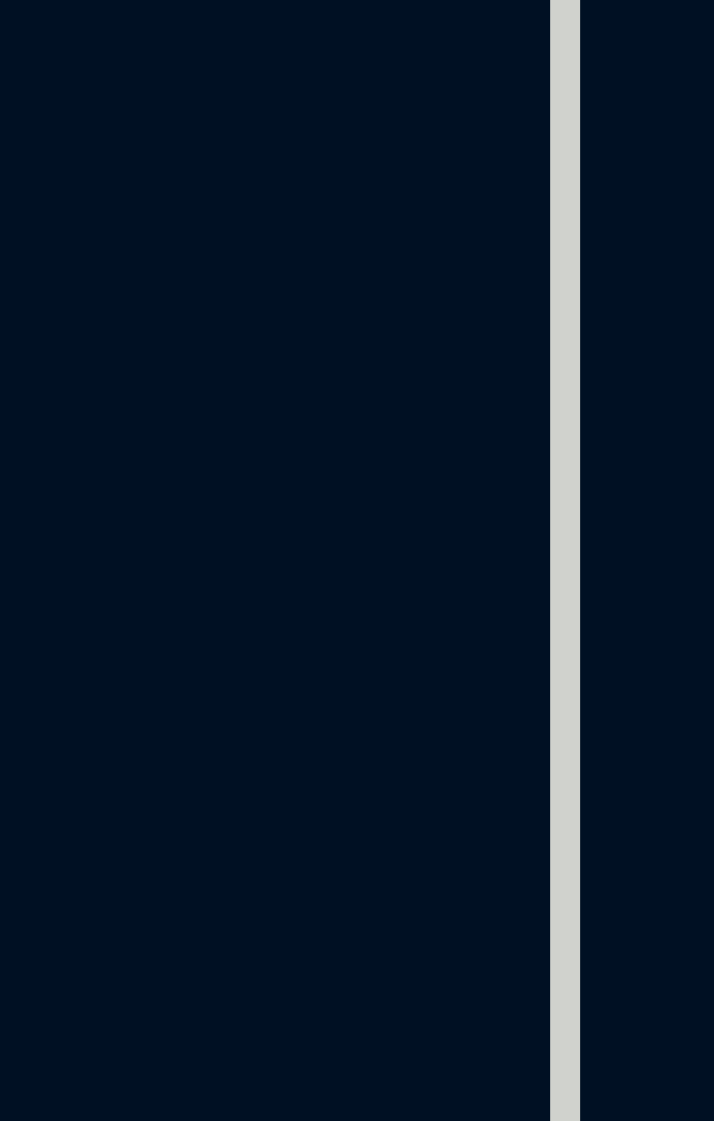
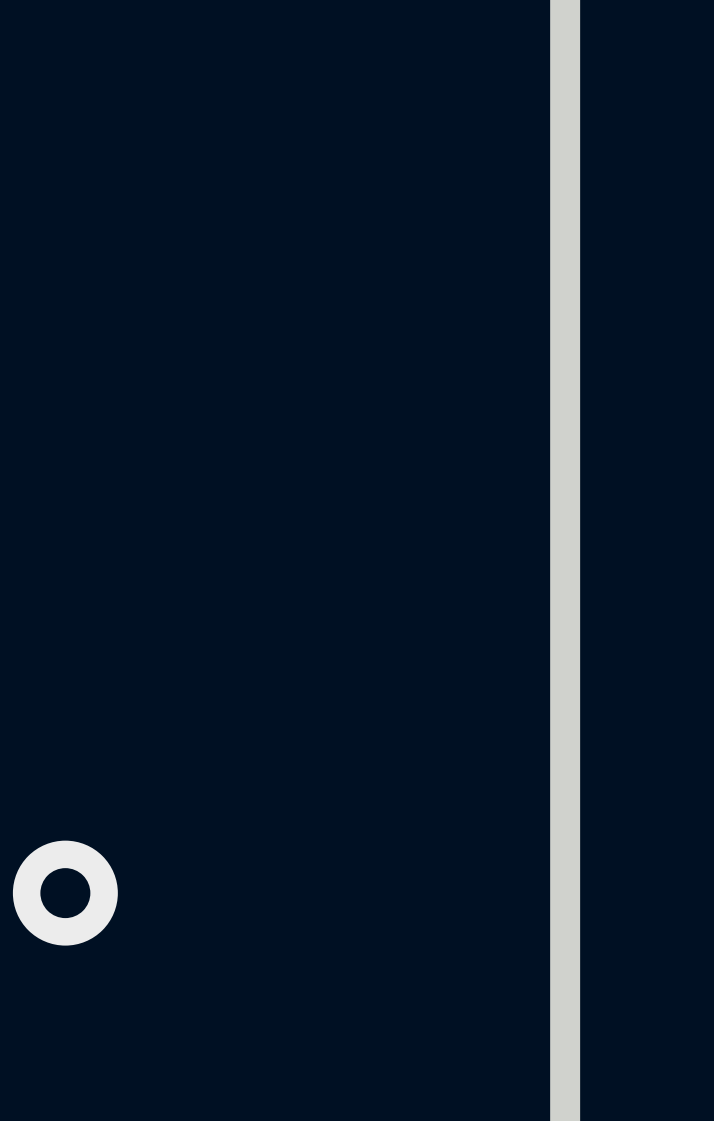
via: none -> (65, 893)

